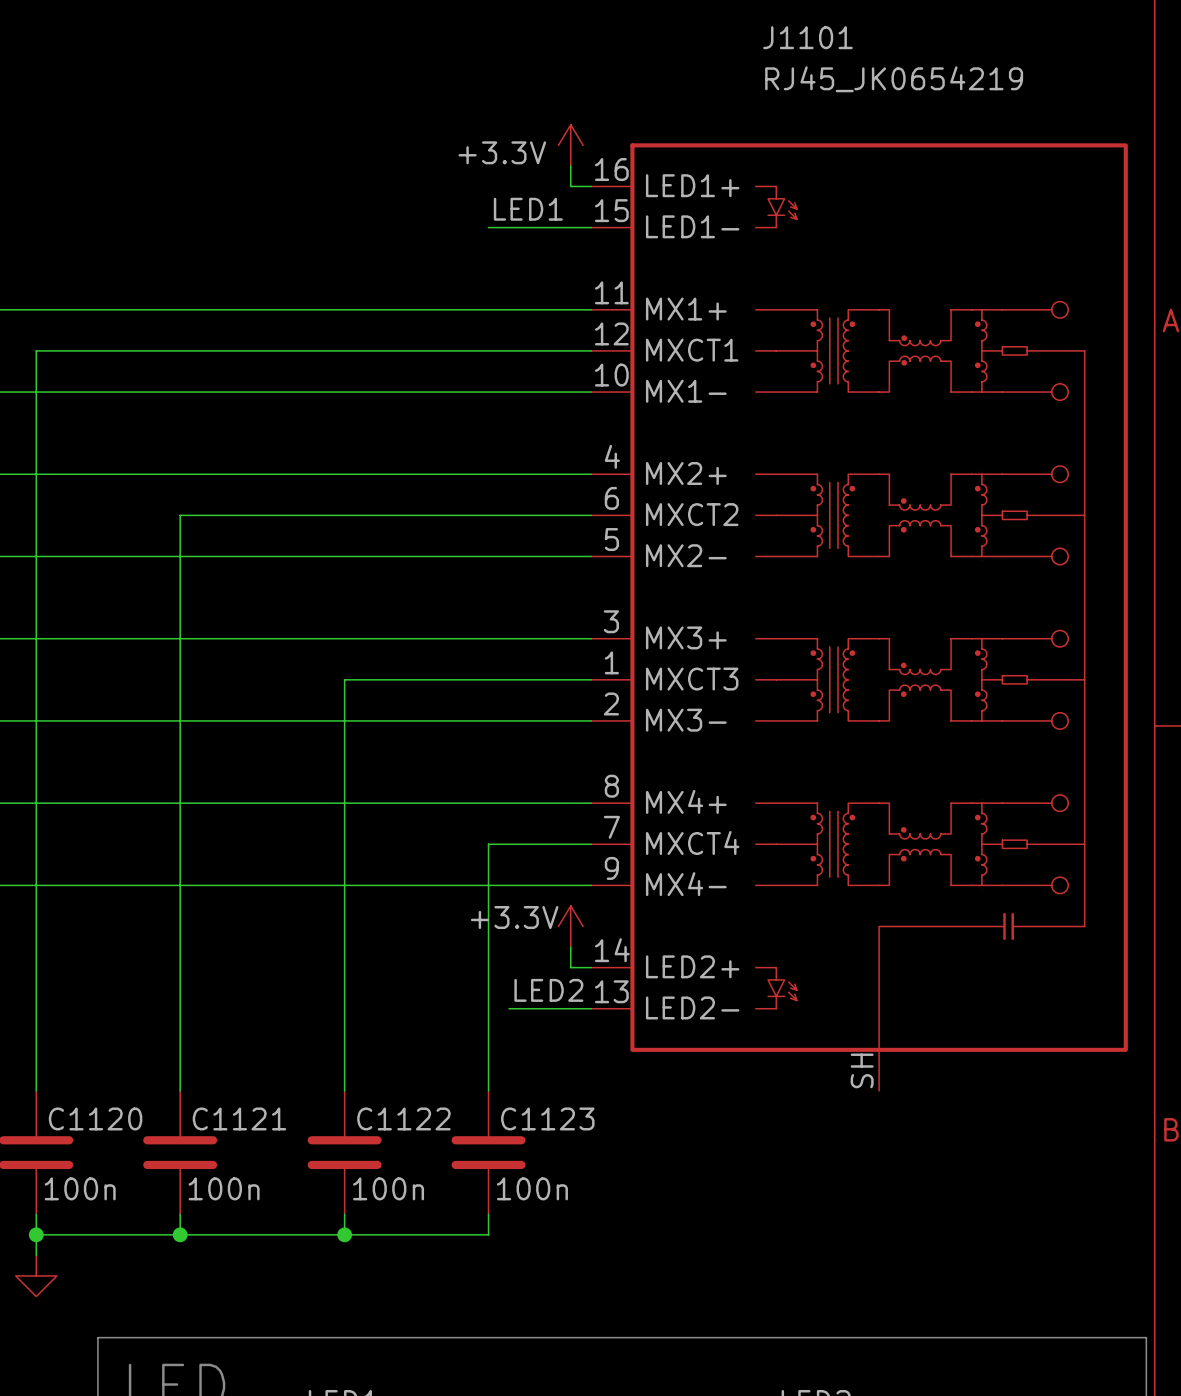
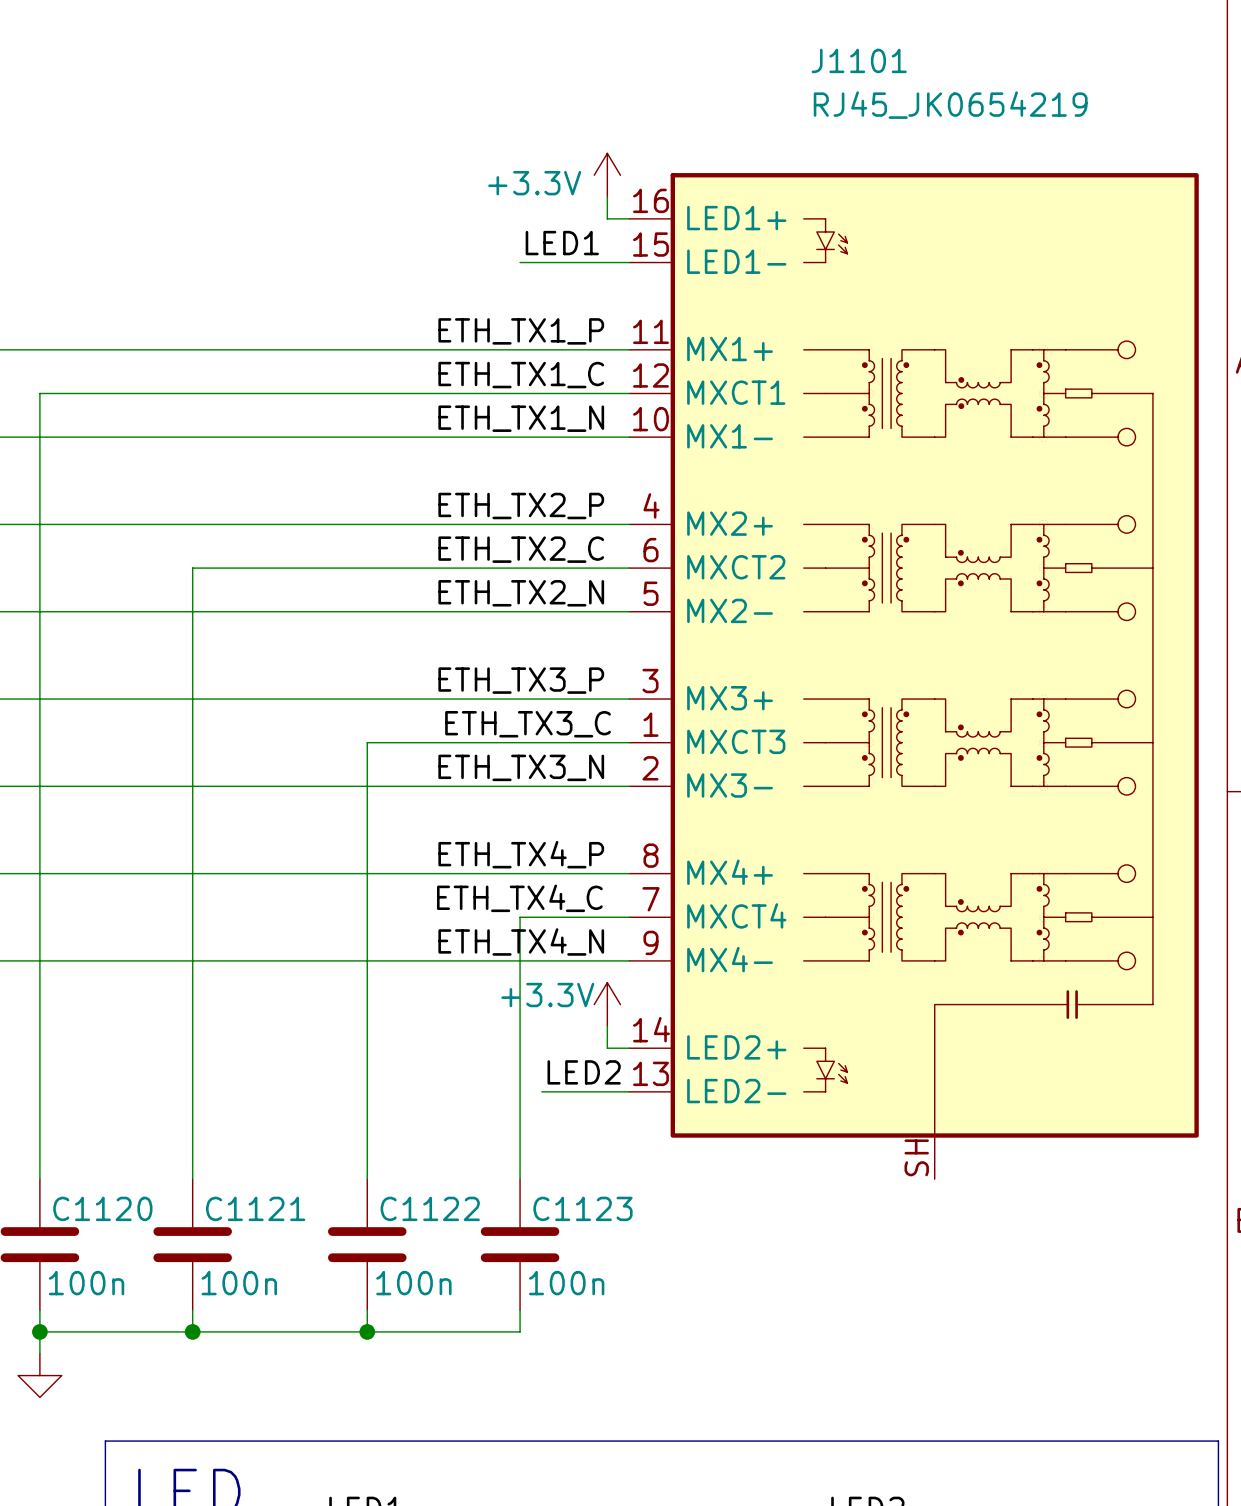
label: none -> ETH_TX1_P (521, 331)
label: none -> ETH_TX1_C (521, 375)
label: none -> ETH_TX1_N (521, 418)
label: none -> ETH_TX2_P (521, 505)
label: none -> ETH_TX2_C (521, 549)
label: none -> ETH_TX2_N (521, 593)
label: none -> ETH_TX3_P (521, 680)
label: none -> ETH_TX3_C (528, 724)
label: none -> ETH_TX3_N (521, 767)
label: none -> ETH_TX4_P (521, 854)
label: none -> ETH_TX4_C (519, 898)
label: none -> ETH_TX4_N (521, 941)

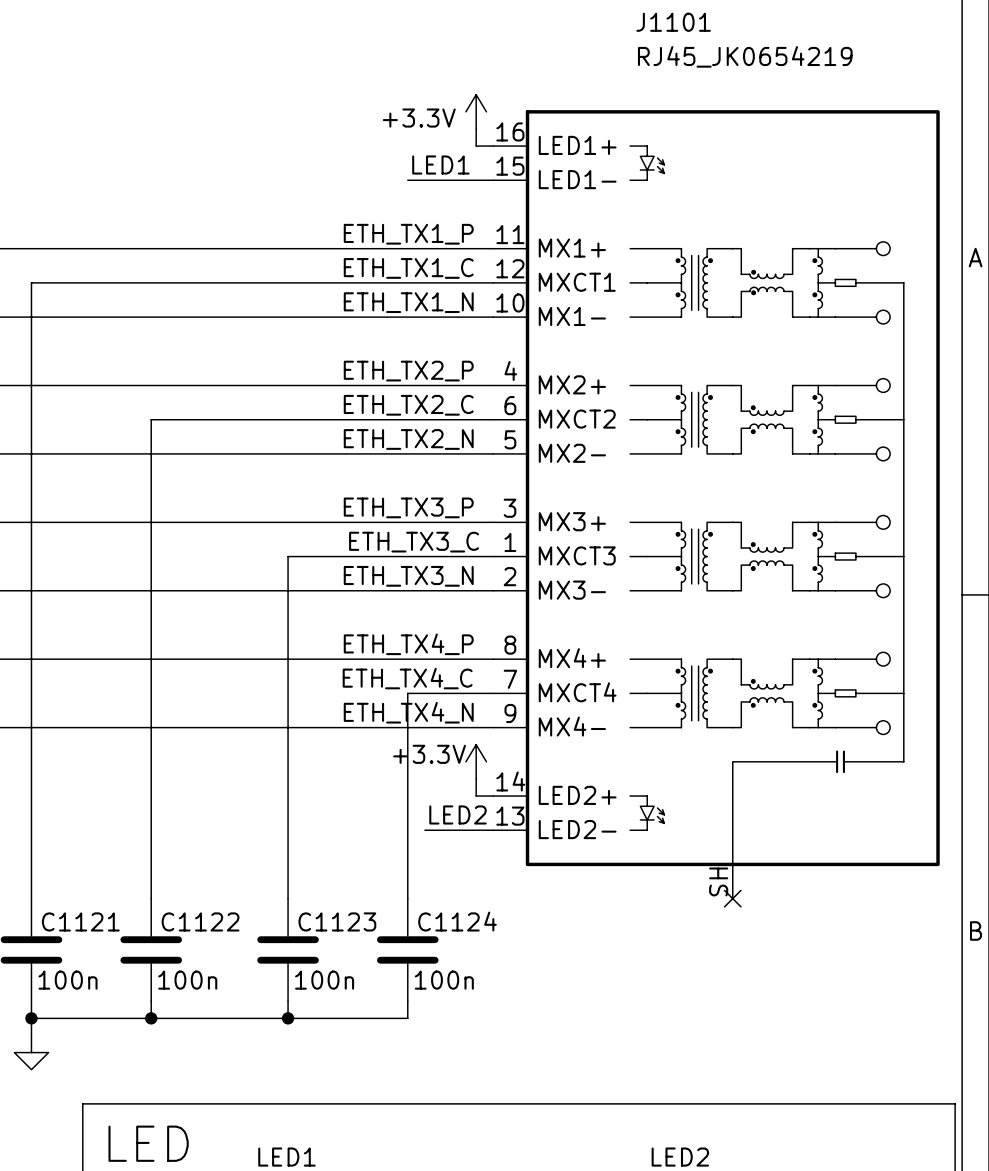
no-connect mark: none -> (732, 898)
C1120 name: C1120 (102, 1208) -> C1121 (80, 921)
C1121 name: C1121 (255, 1208) -> C1122 (200, 921)
C1122 name: C1122 (430, 1208) -> C1123 (337, 921)
C1123 name: C1123 (582, 1208) -> C1124 (457, 921)

